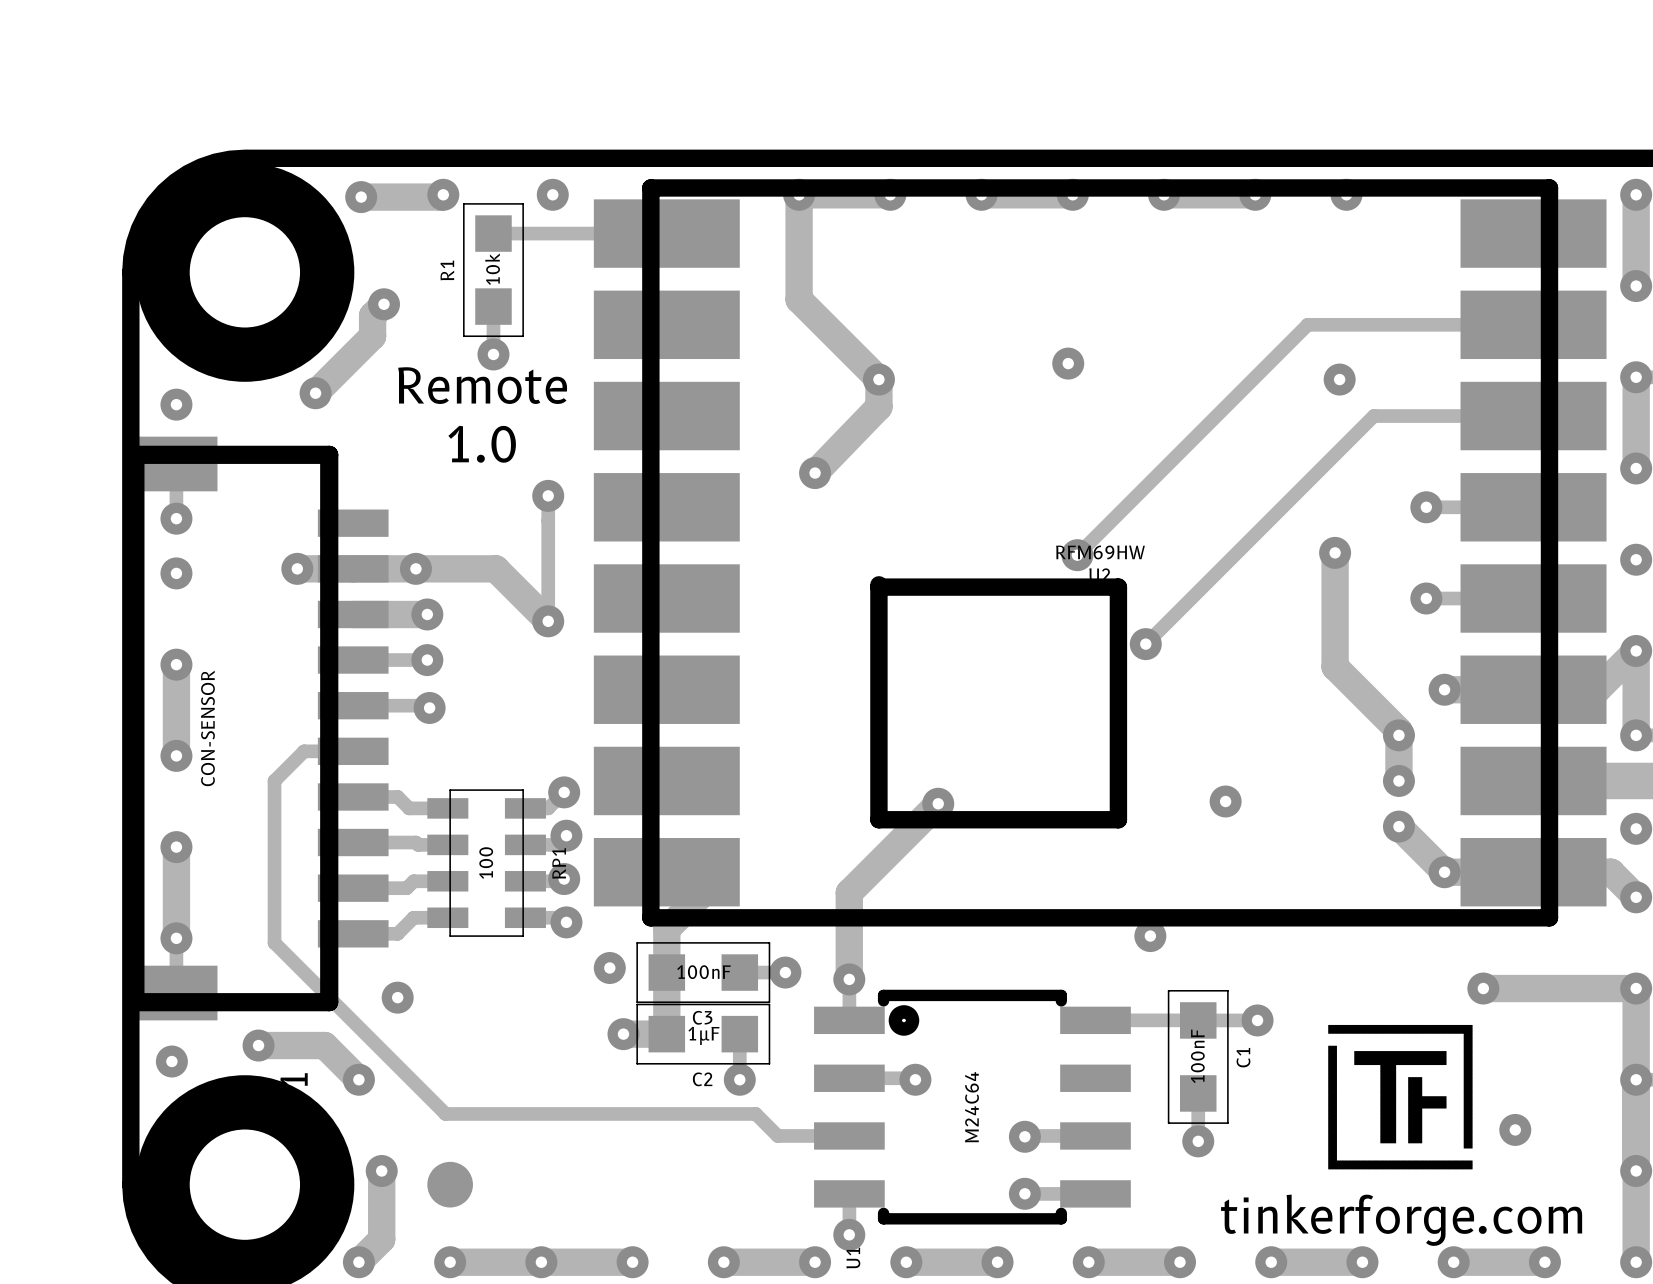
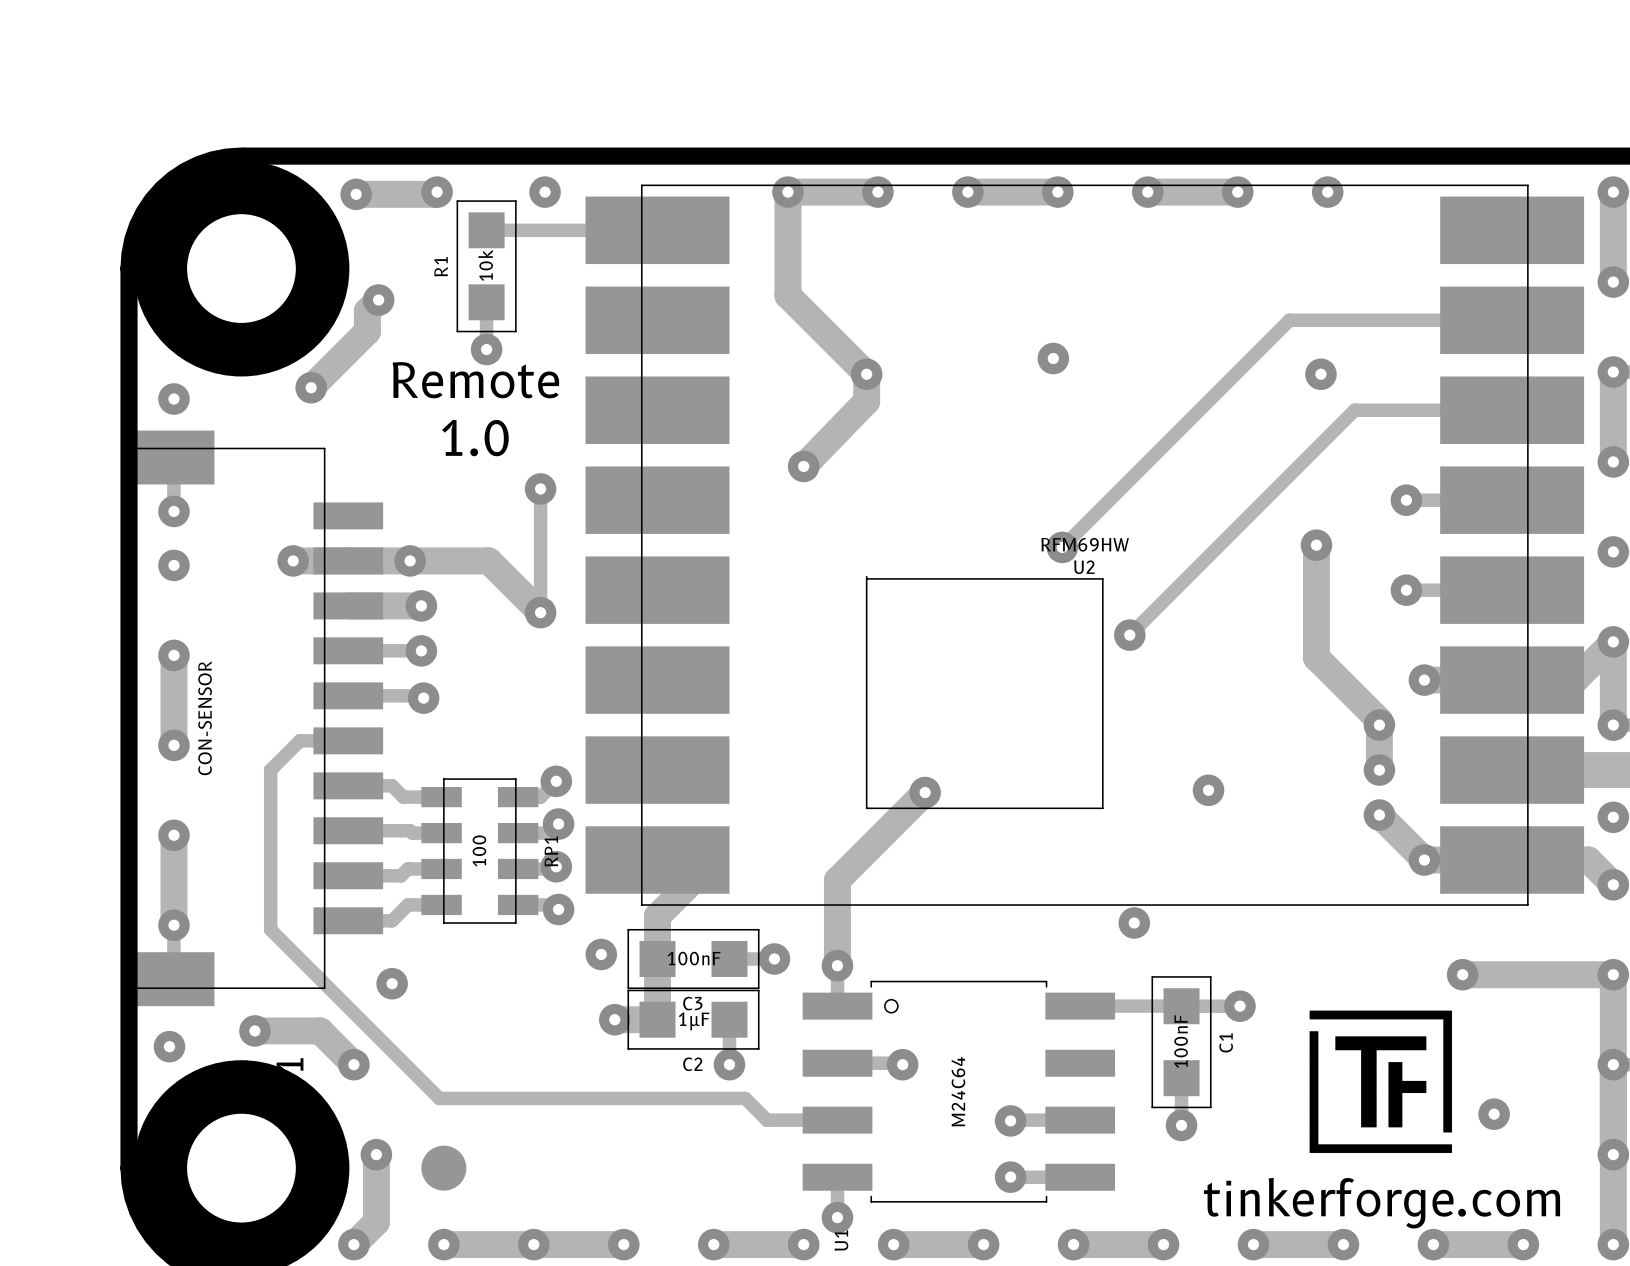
U2 footprint: [593, 179, 1607, 927] -> [585, 185, 1585, 906]
part footprint: [126, 436, 389, 1021] -> [133, 430, 384, 1007]
U1 footprint: [814, 989, 1131, 1225] -> [802, 981, 1116, 1203]

